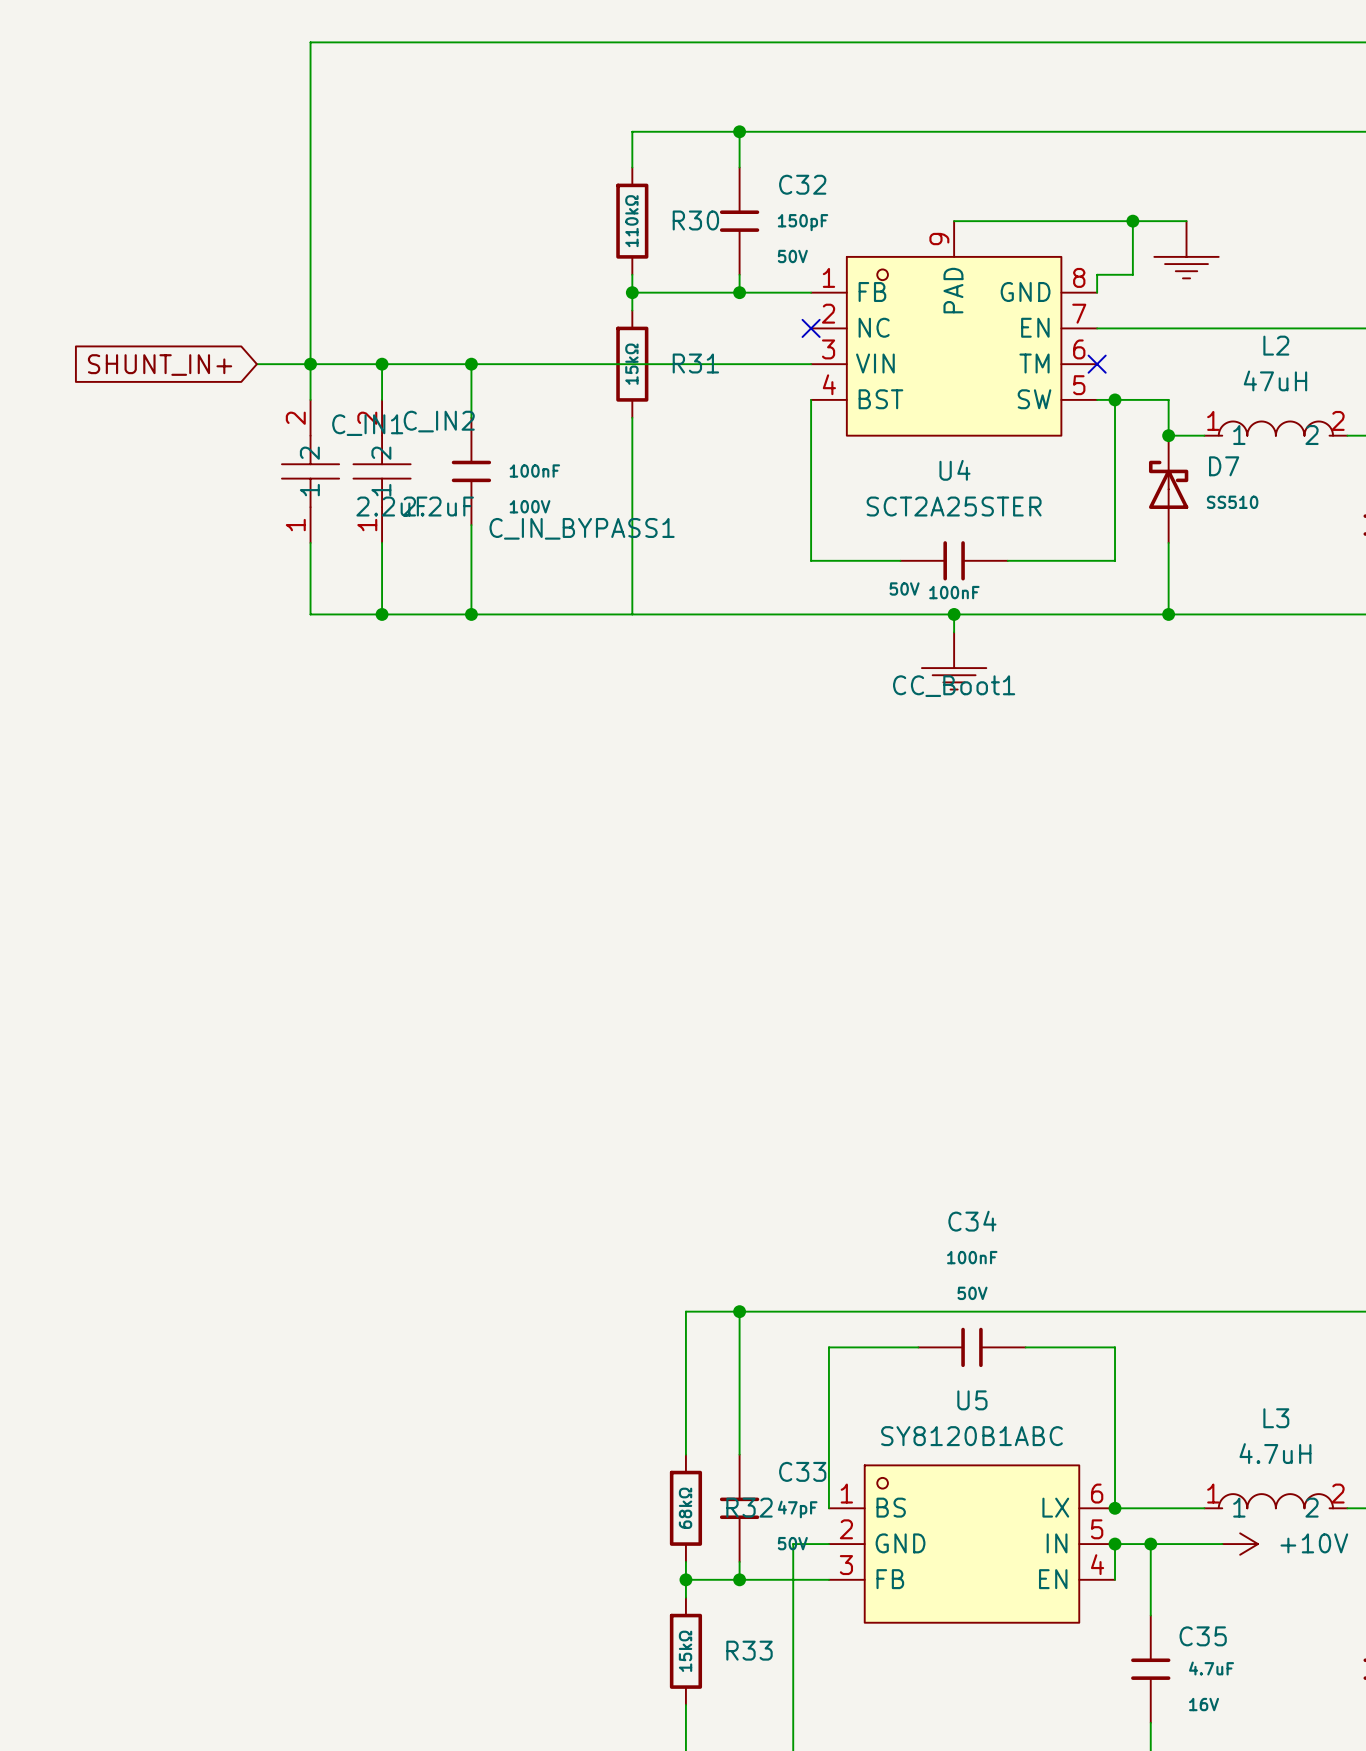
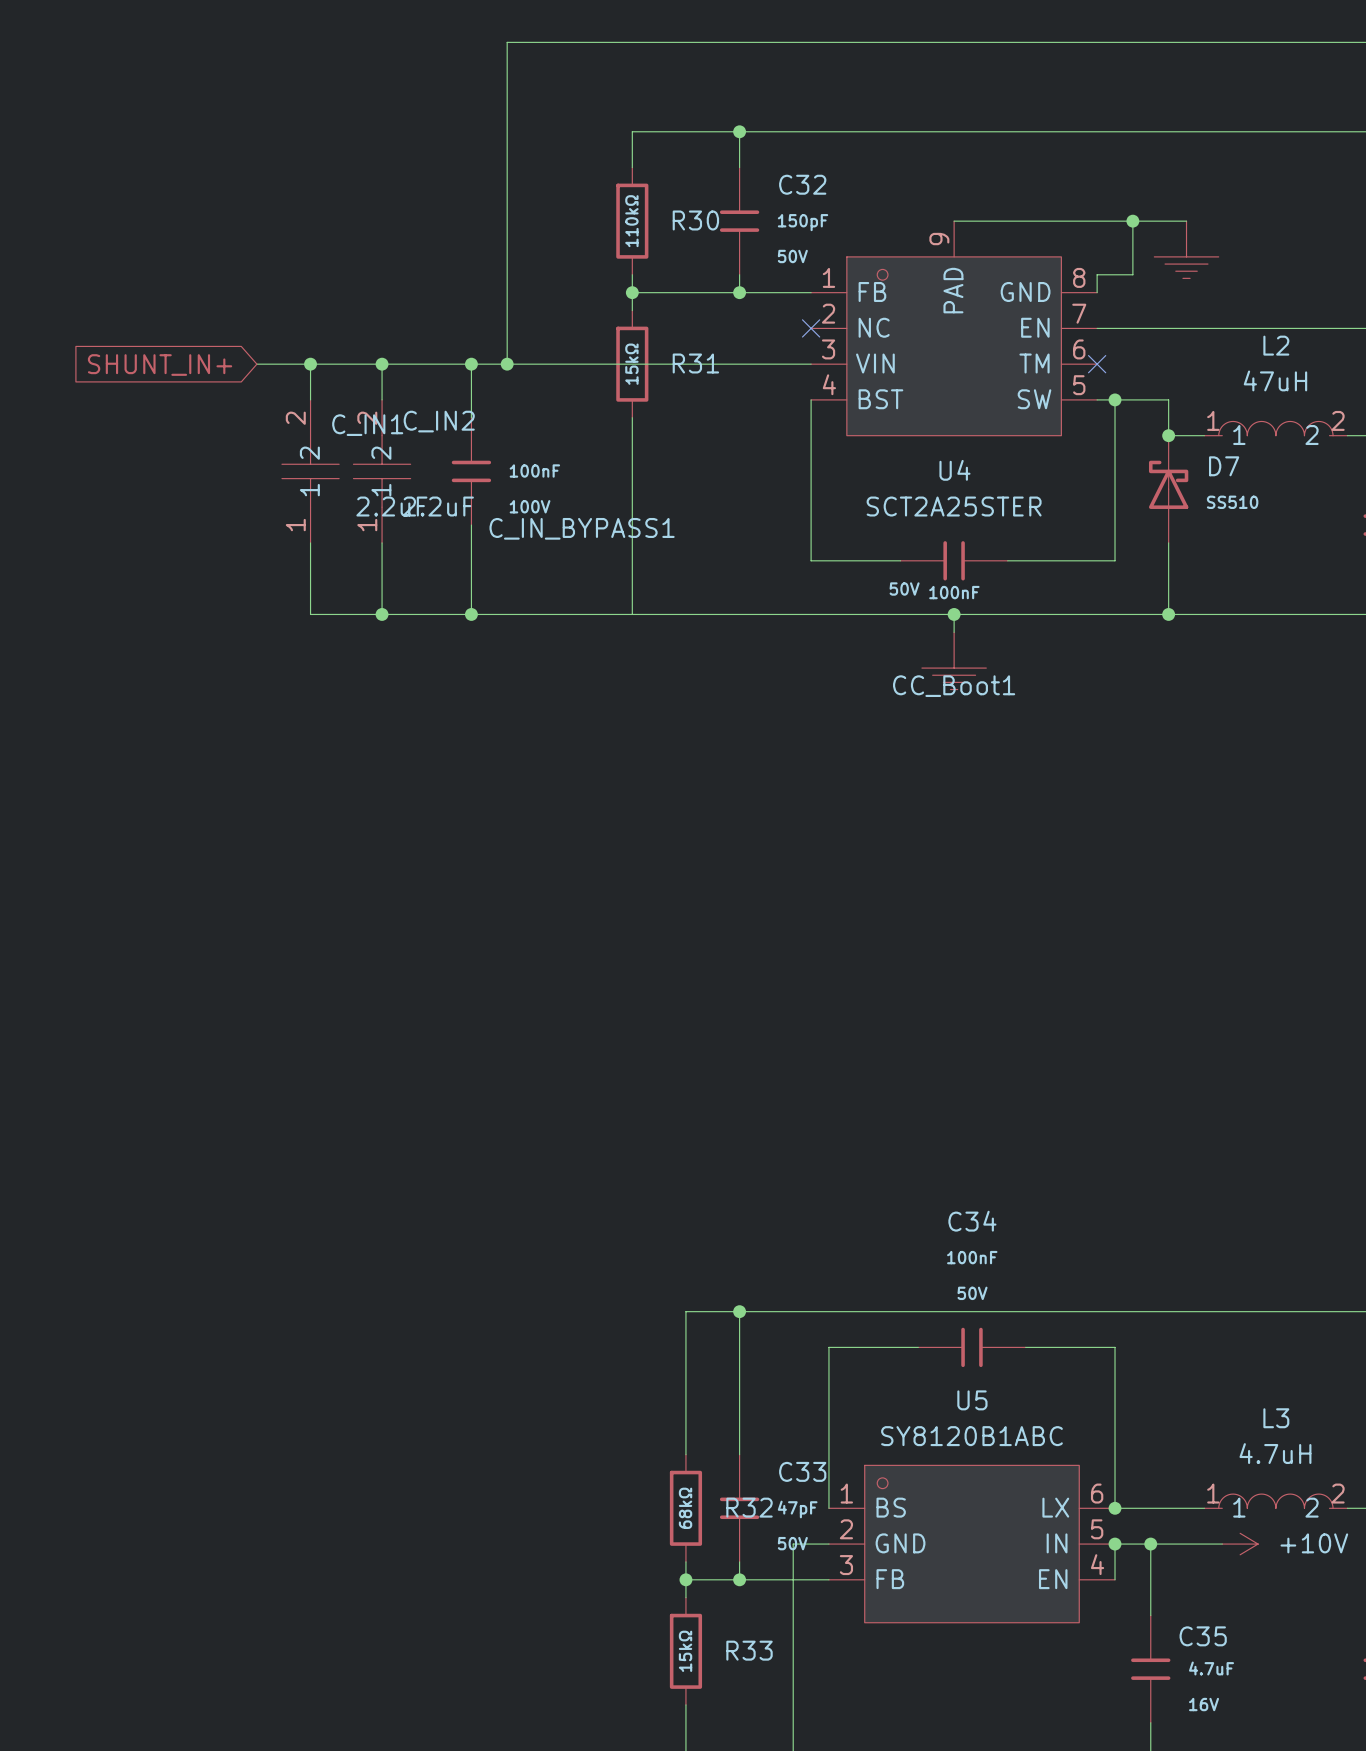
wire: (507, 42) (310, 42) (310, 364) -> (507, 42) (507, 364)
junction: none -> (507, 364)

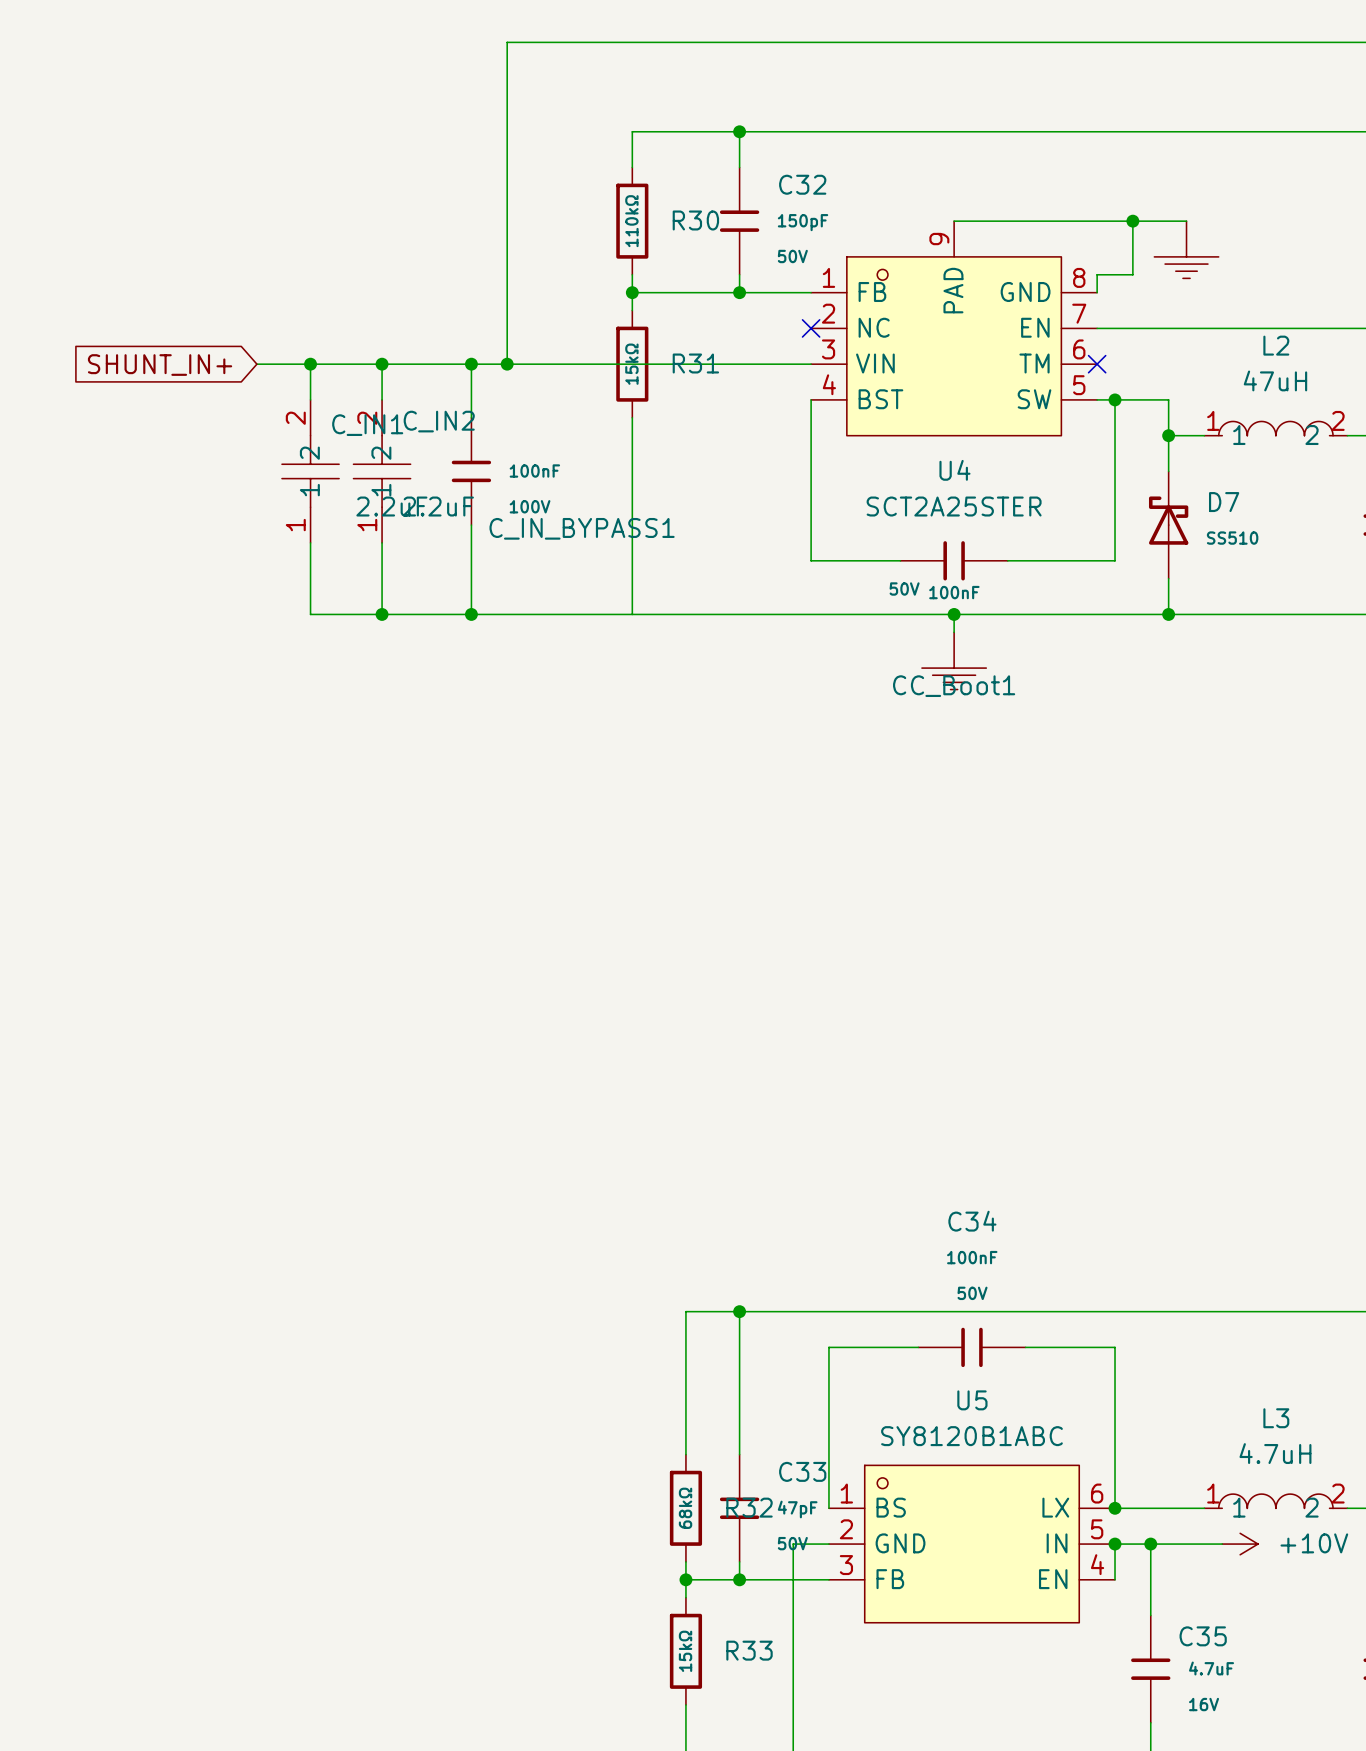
D7 position: (1168, 489) -> (1168, 525)

